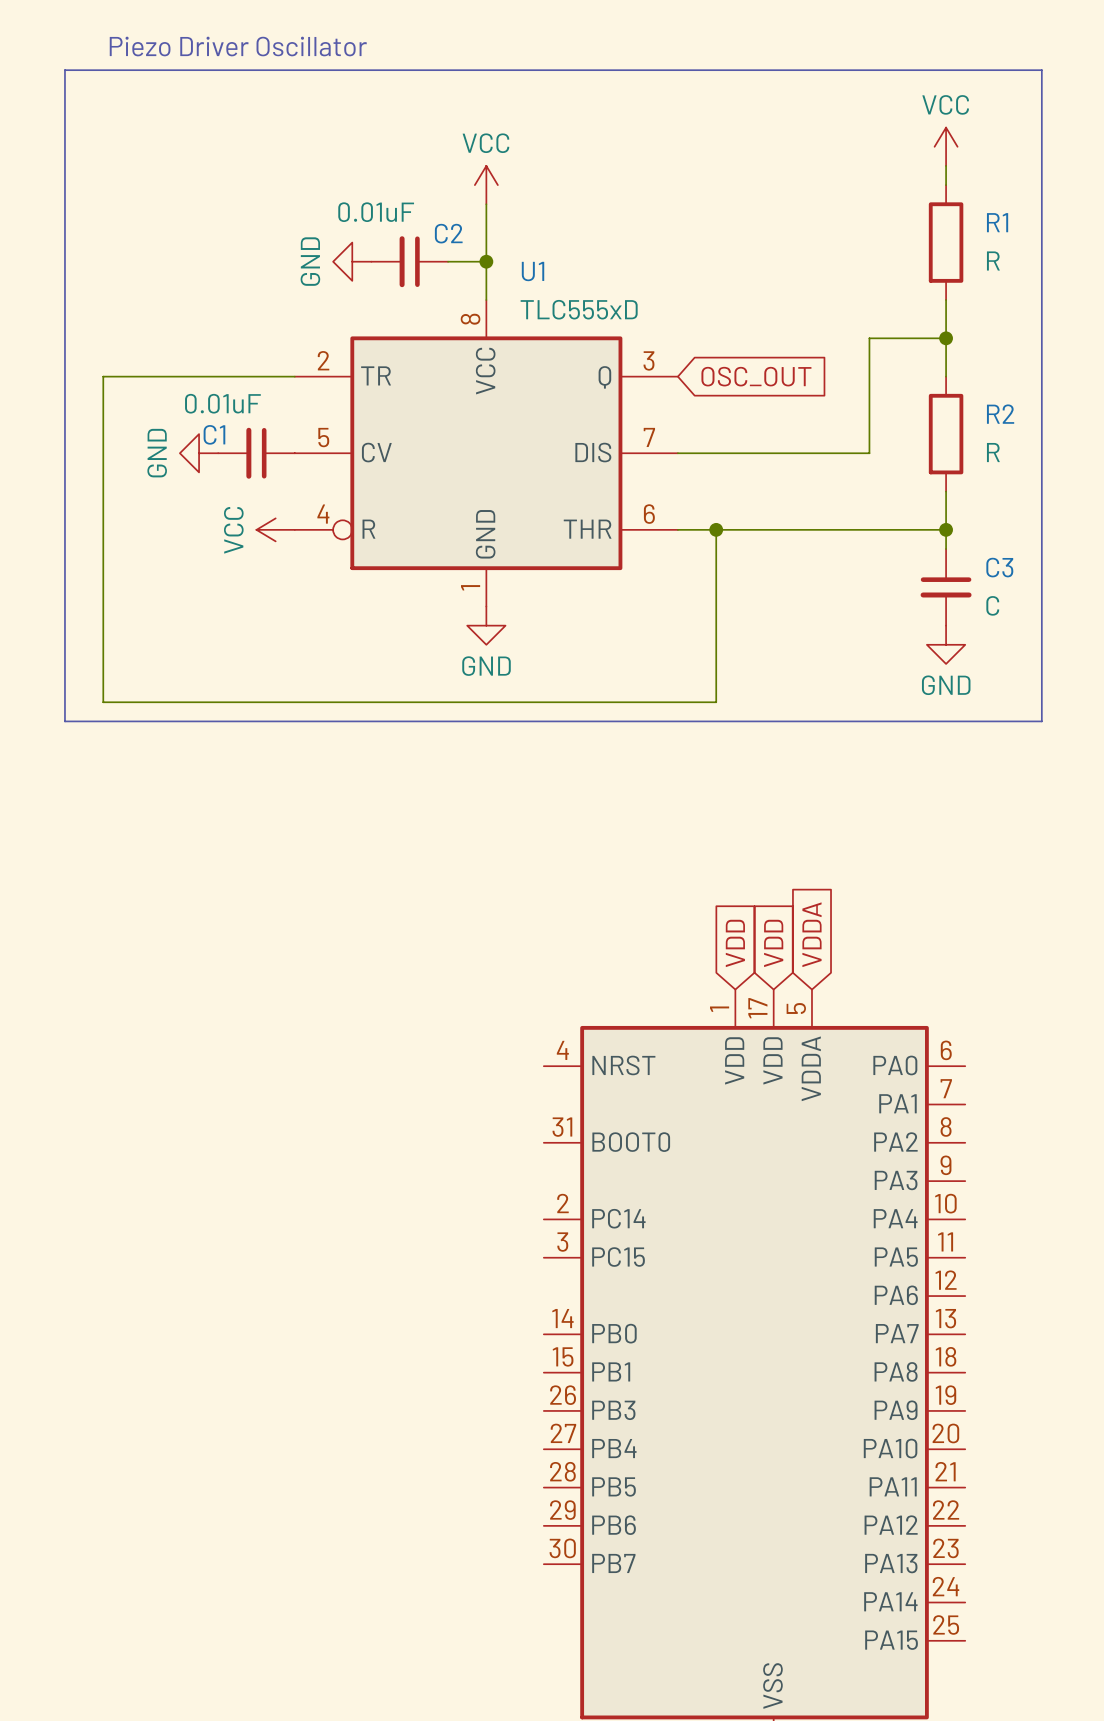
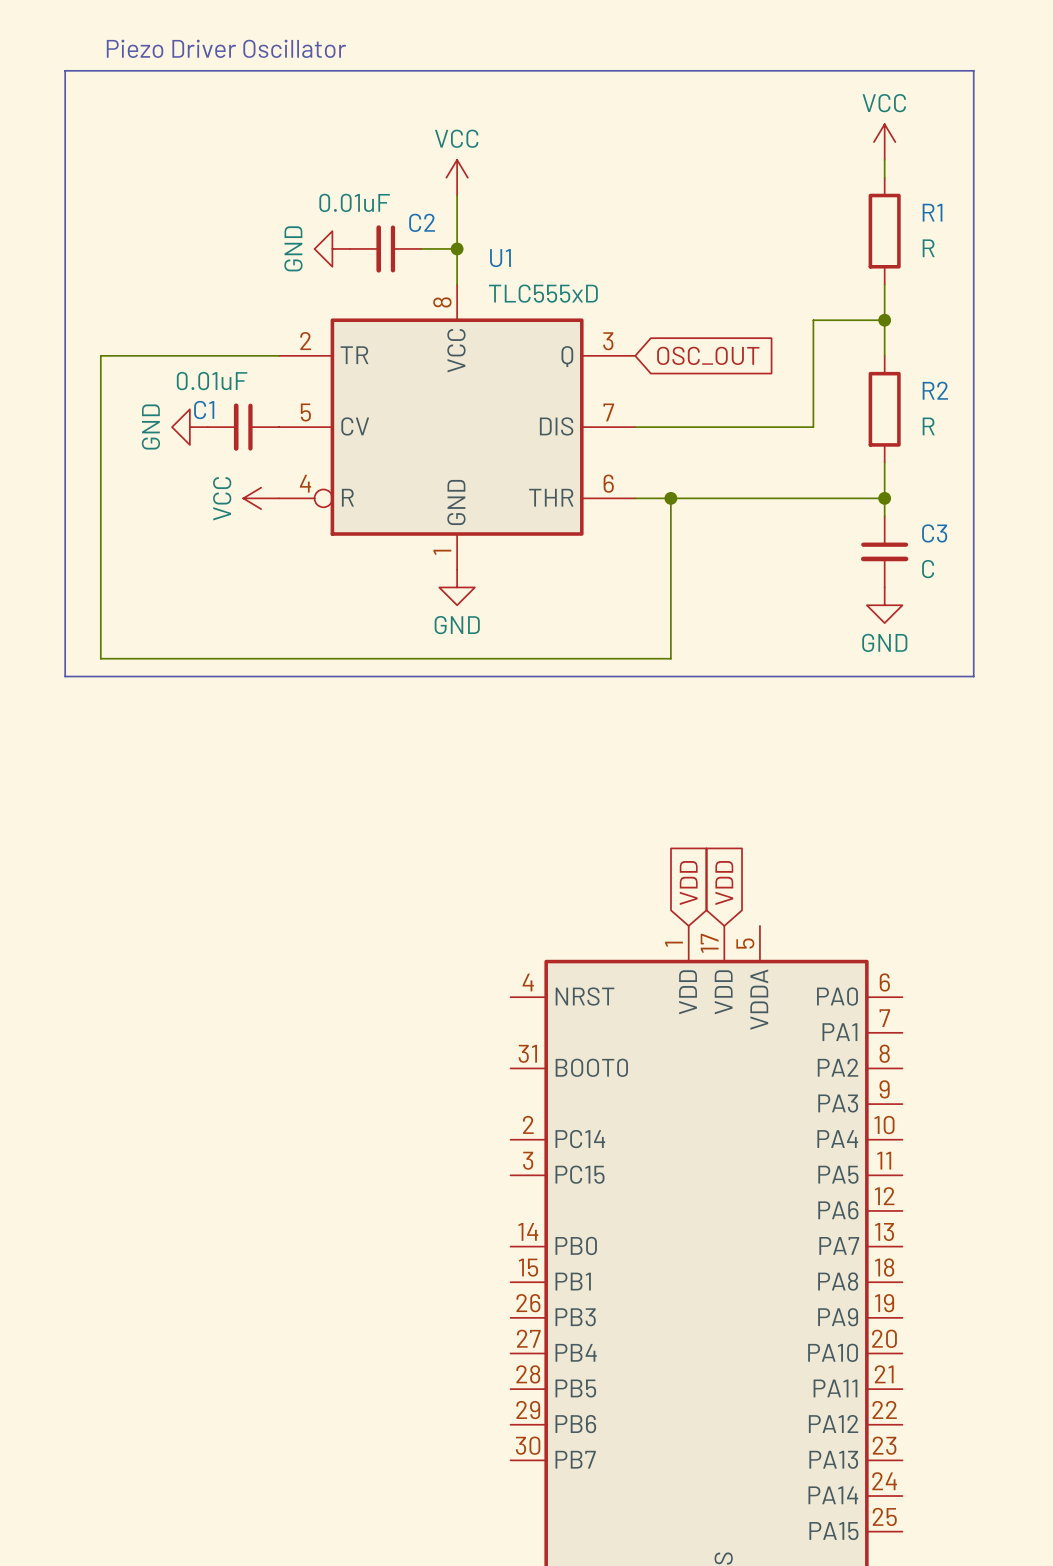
global label: VDDA (811, 934) -> none

